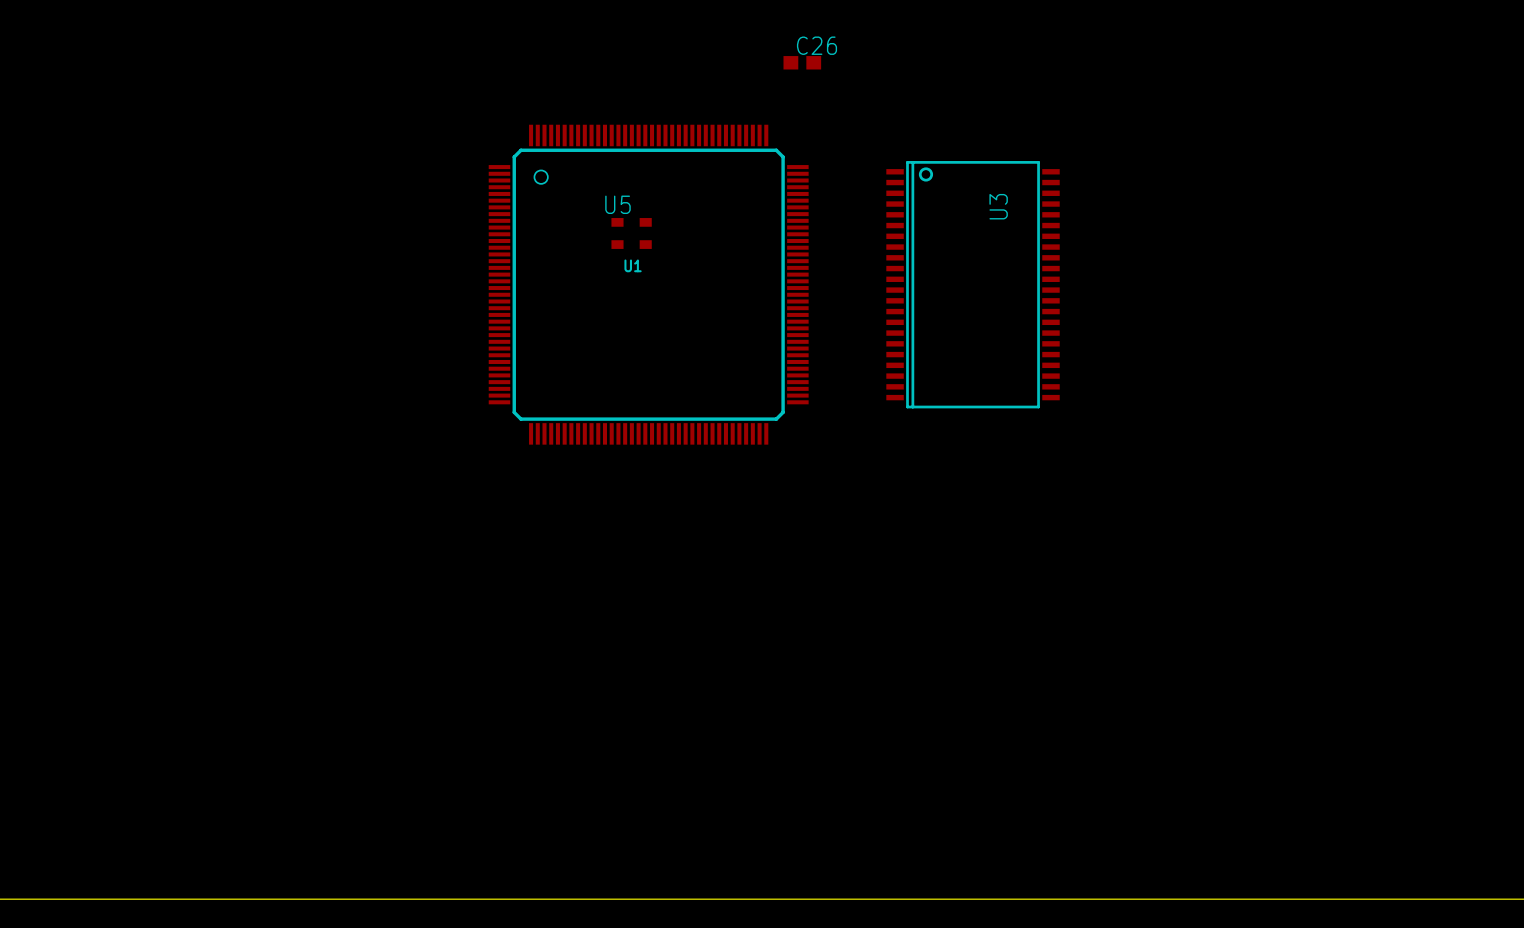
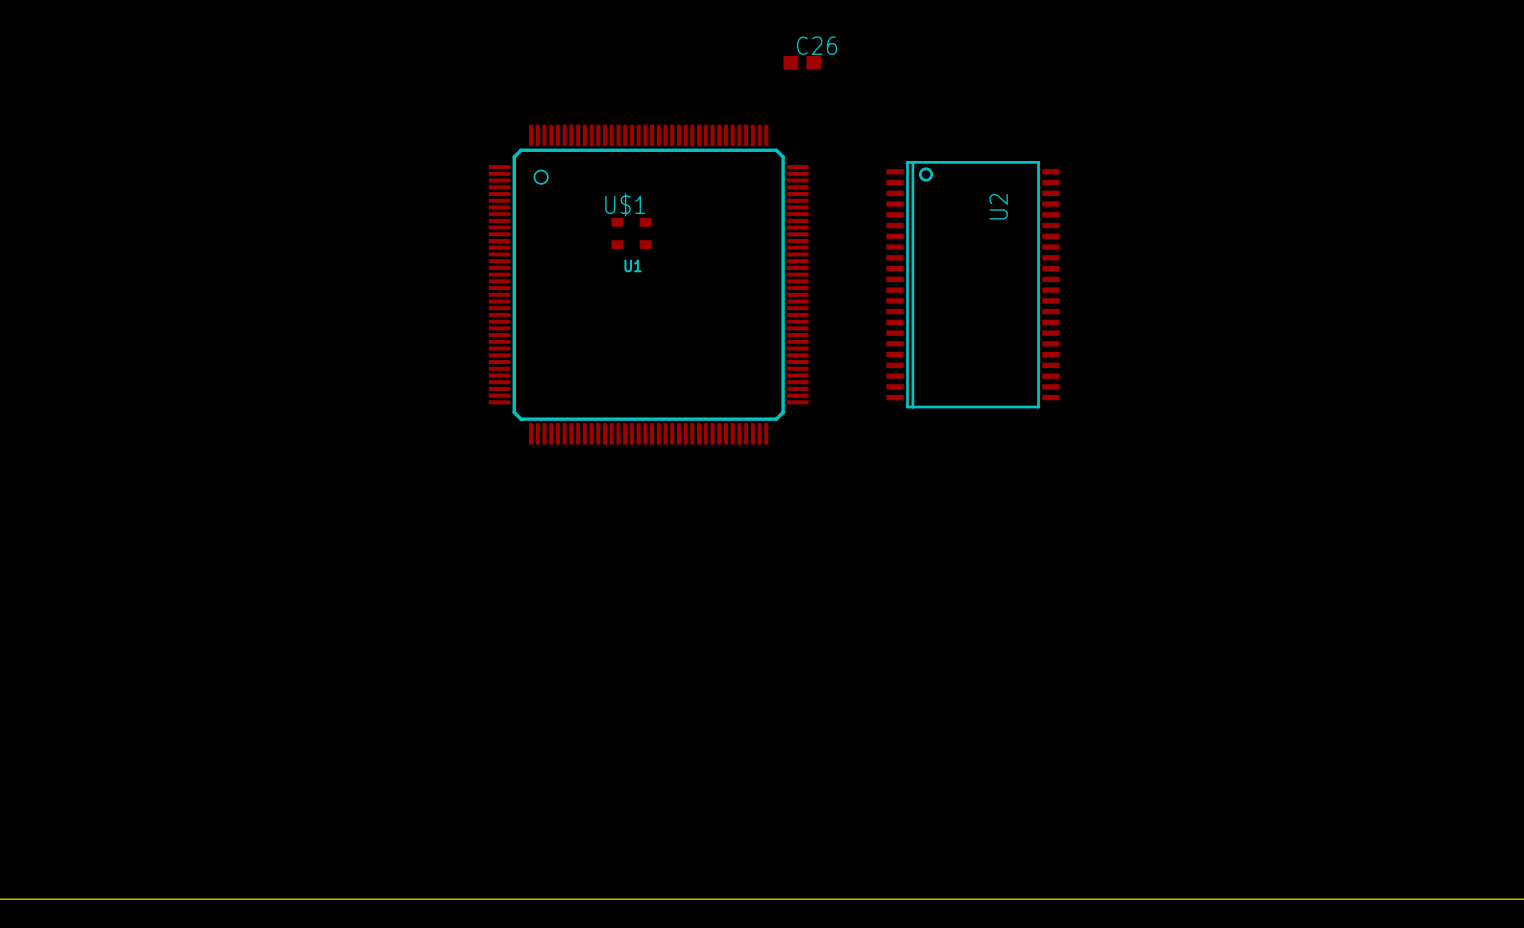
U5 name: U5 (617, 204) -> U$1 (625, 204)
U3 name: U3 (998, 206) -> U2 (998, 206)

